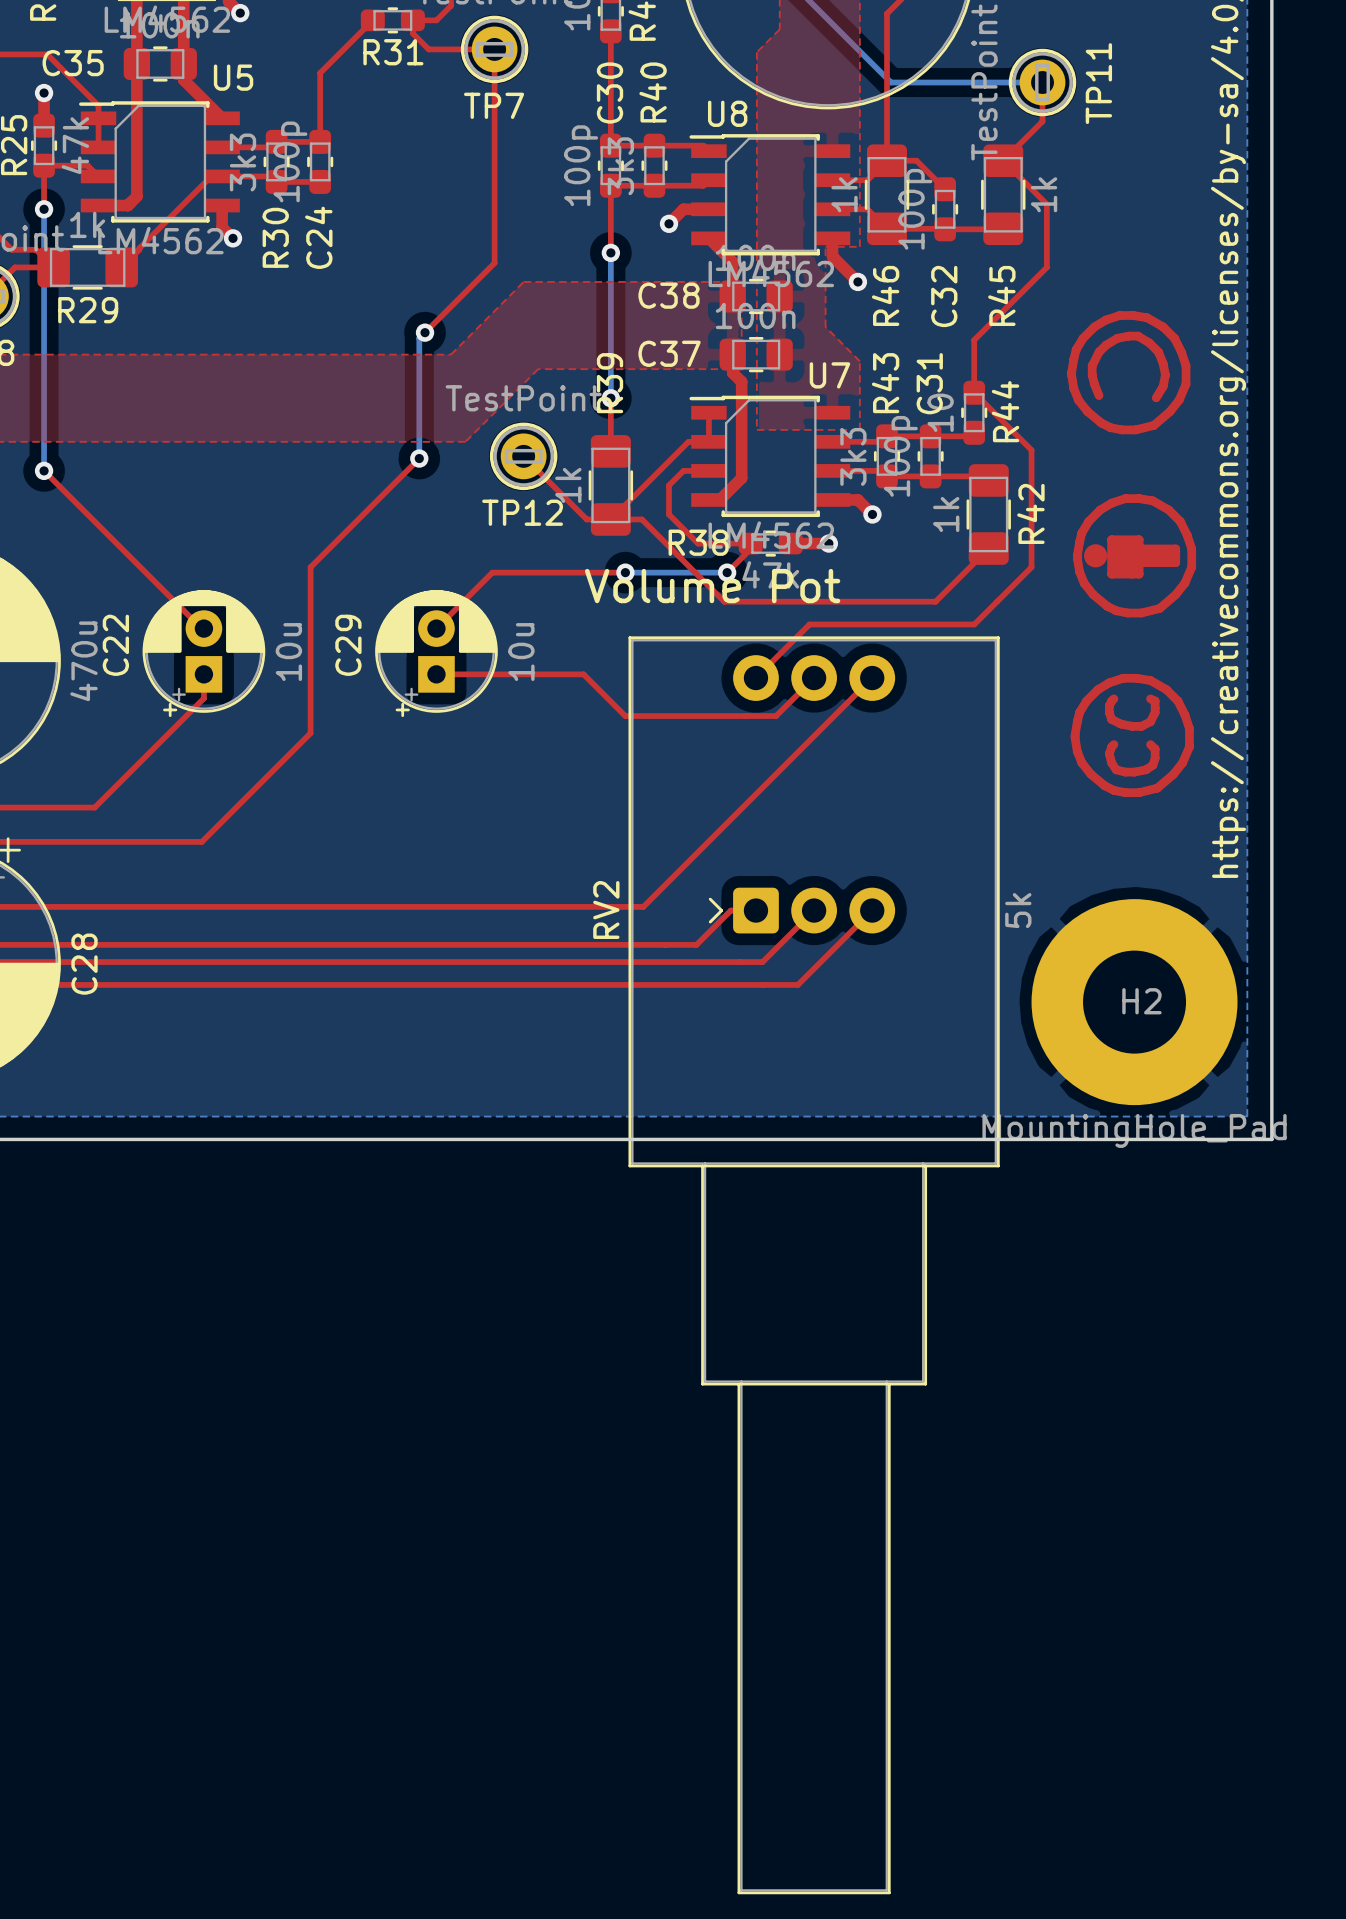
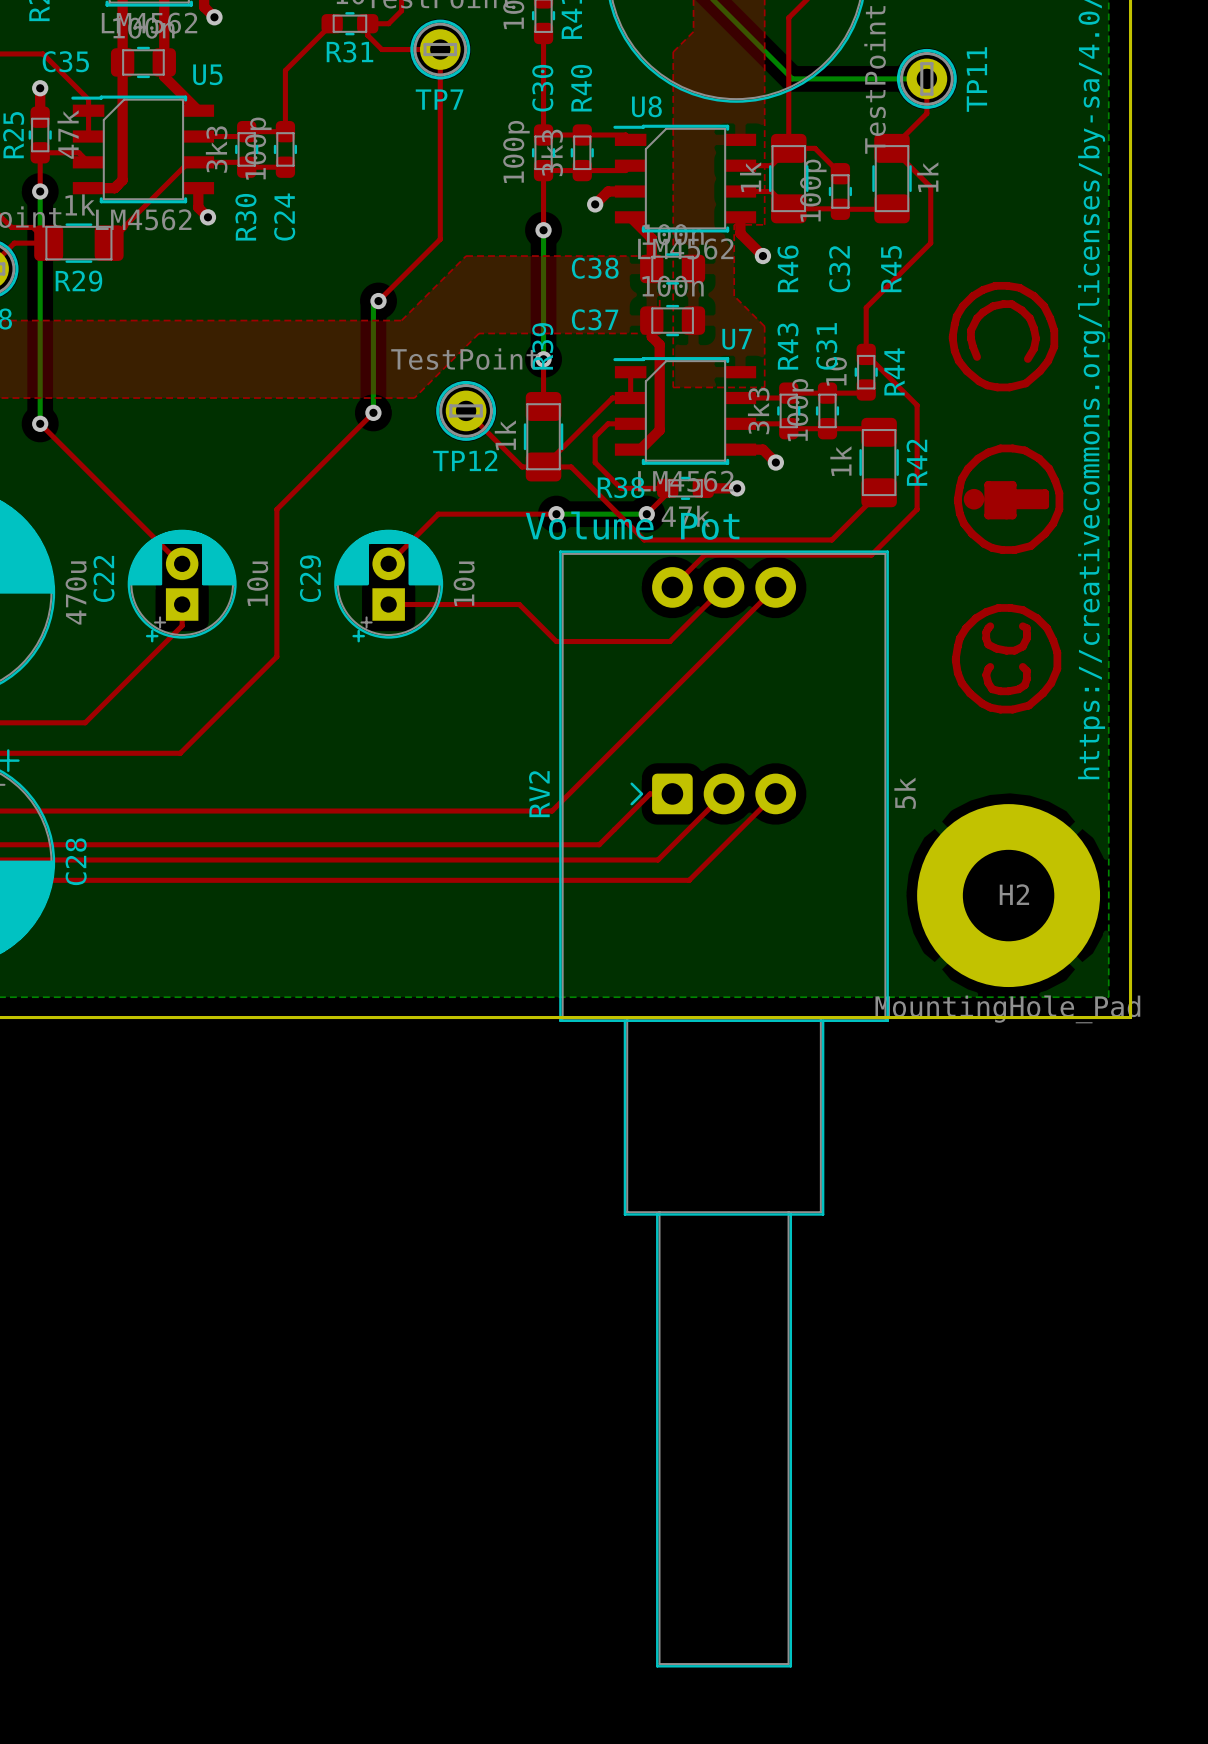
top track: (980, 618) (974, 624) (809, 624) (755, 678) -> (871, 555) (704, 555) (672, 587)
top track: (814, 678) (776, 716) (753, 716) -> (724, 587) (669, 641)
top track: (872, 678) (643, 906) (620, 906) -> (775, 587) (552, 811)
top track: (755, 910) (730, 910) (696, 944) (673, 944) -> (672, 793) (650, 793) (599, 844)
top track: (814, 910) (762, 962) (739, 962) -> (724, 793) (657, 860)
top track: (872, 910) (797, 984) (774, 984) -> (775, 793) (689, 880)
RV2 position: (814, 1265) -> (724, 1108)

